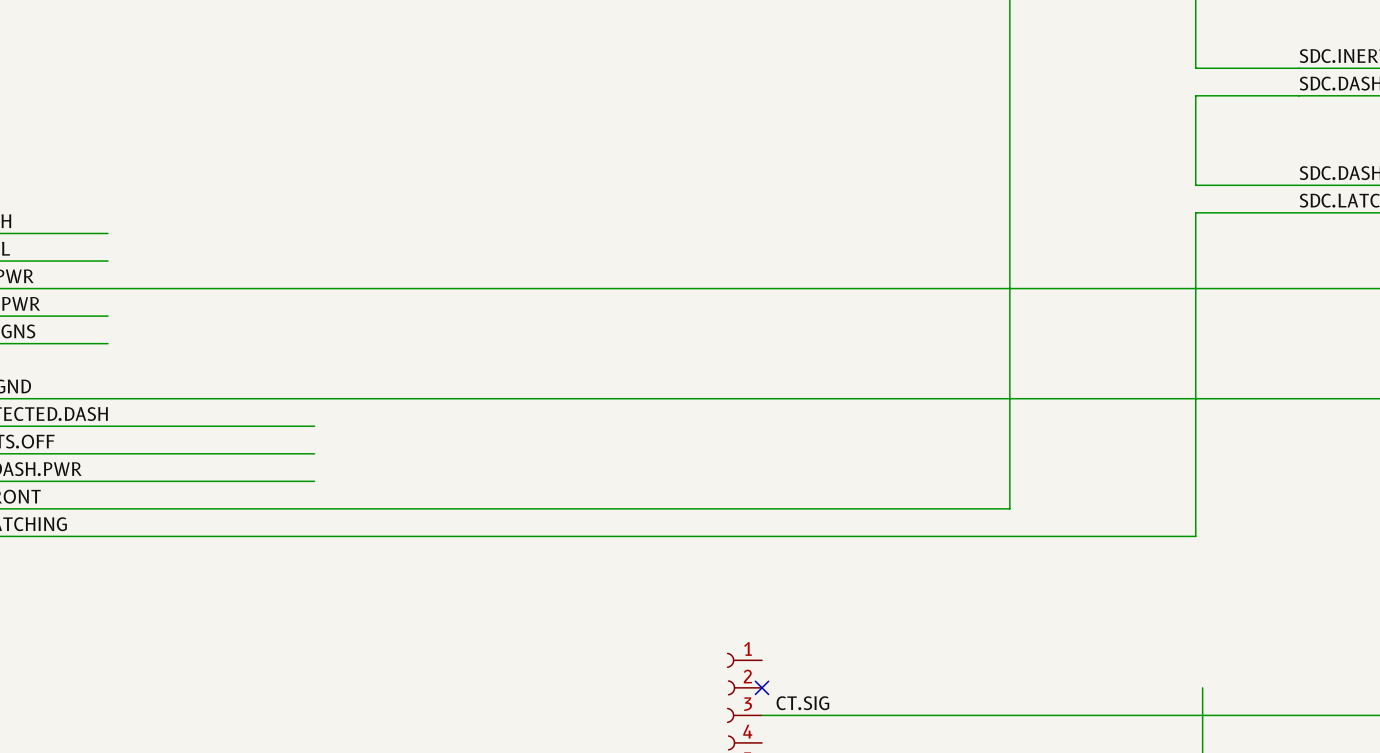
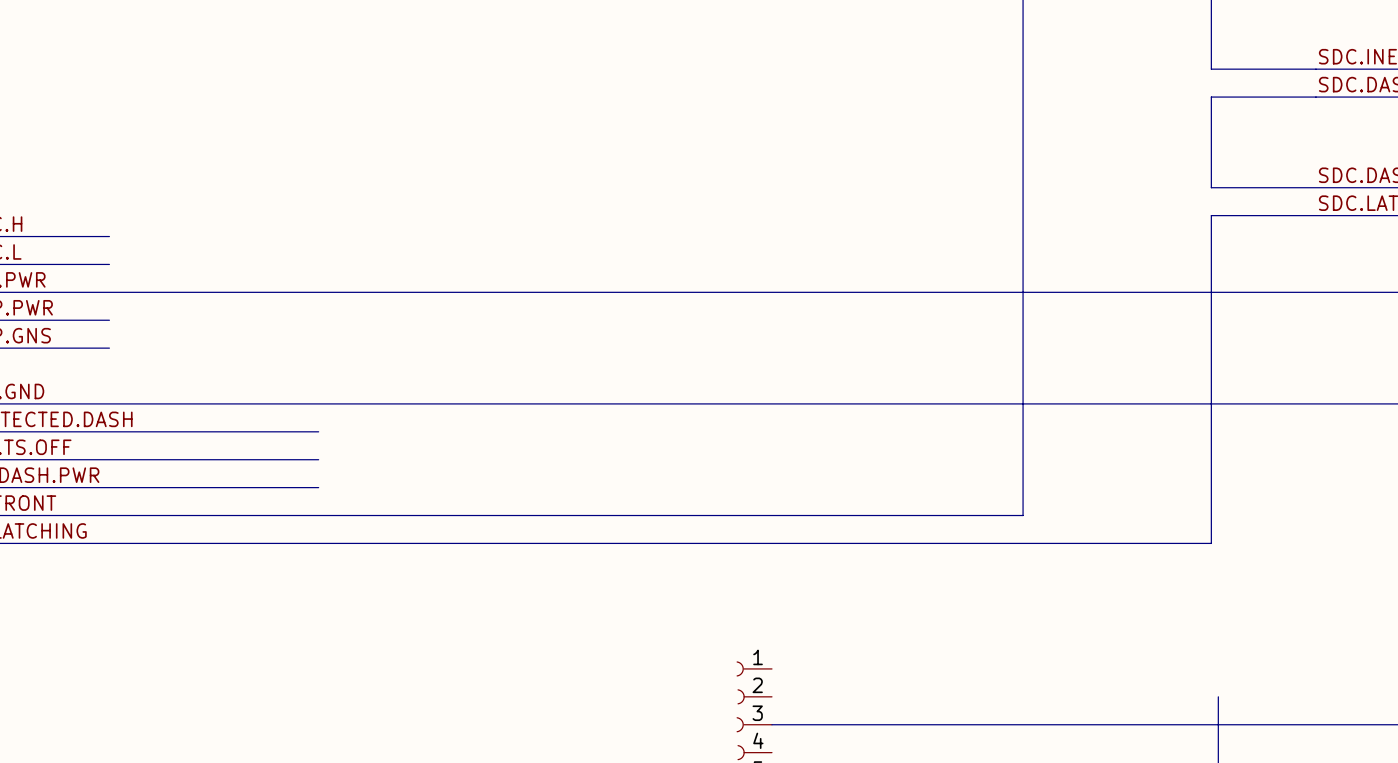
no-connect mark: (762, 687) -> none
label: CT.SIG (802, 703) -> none

